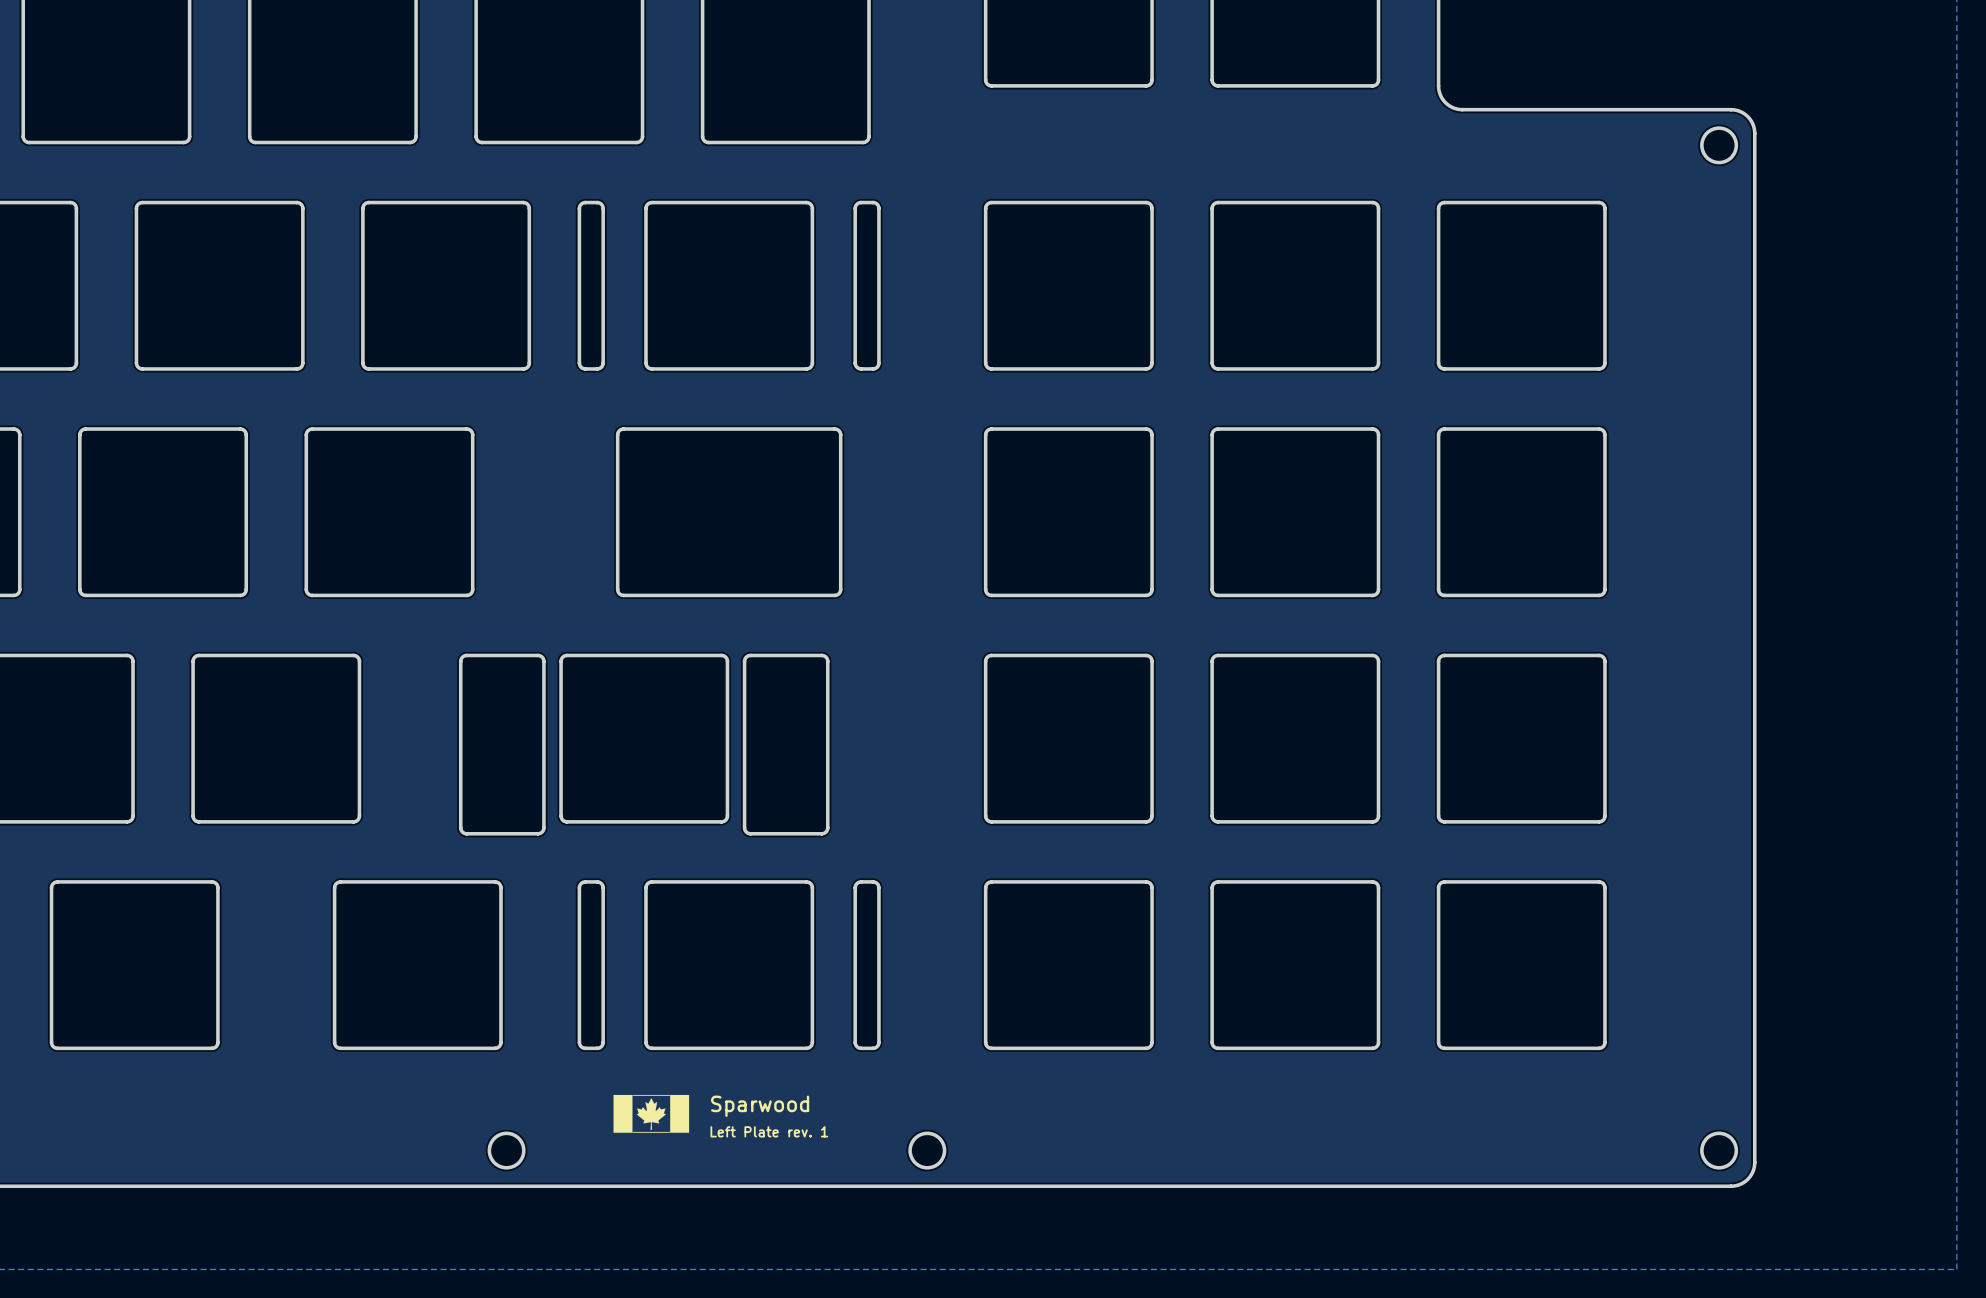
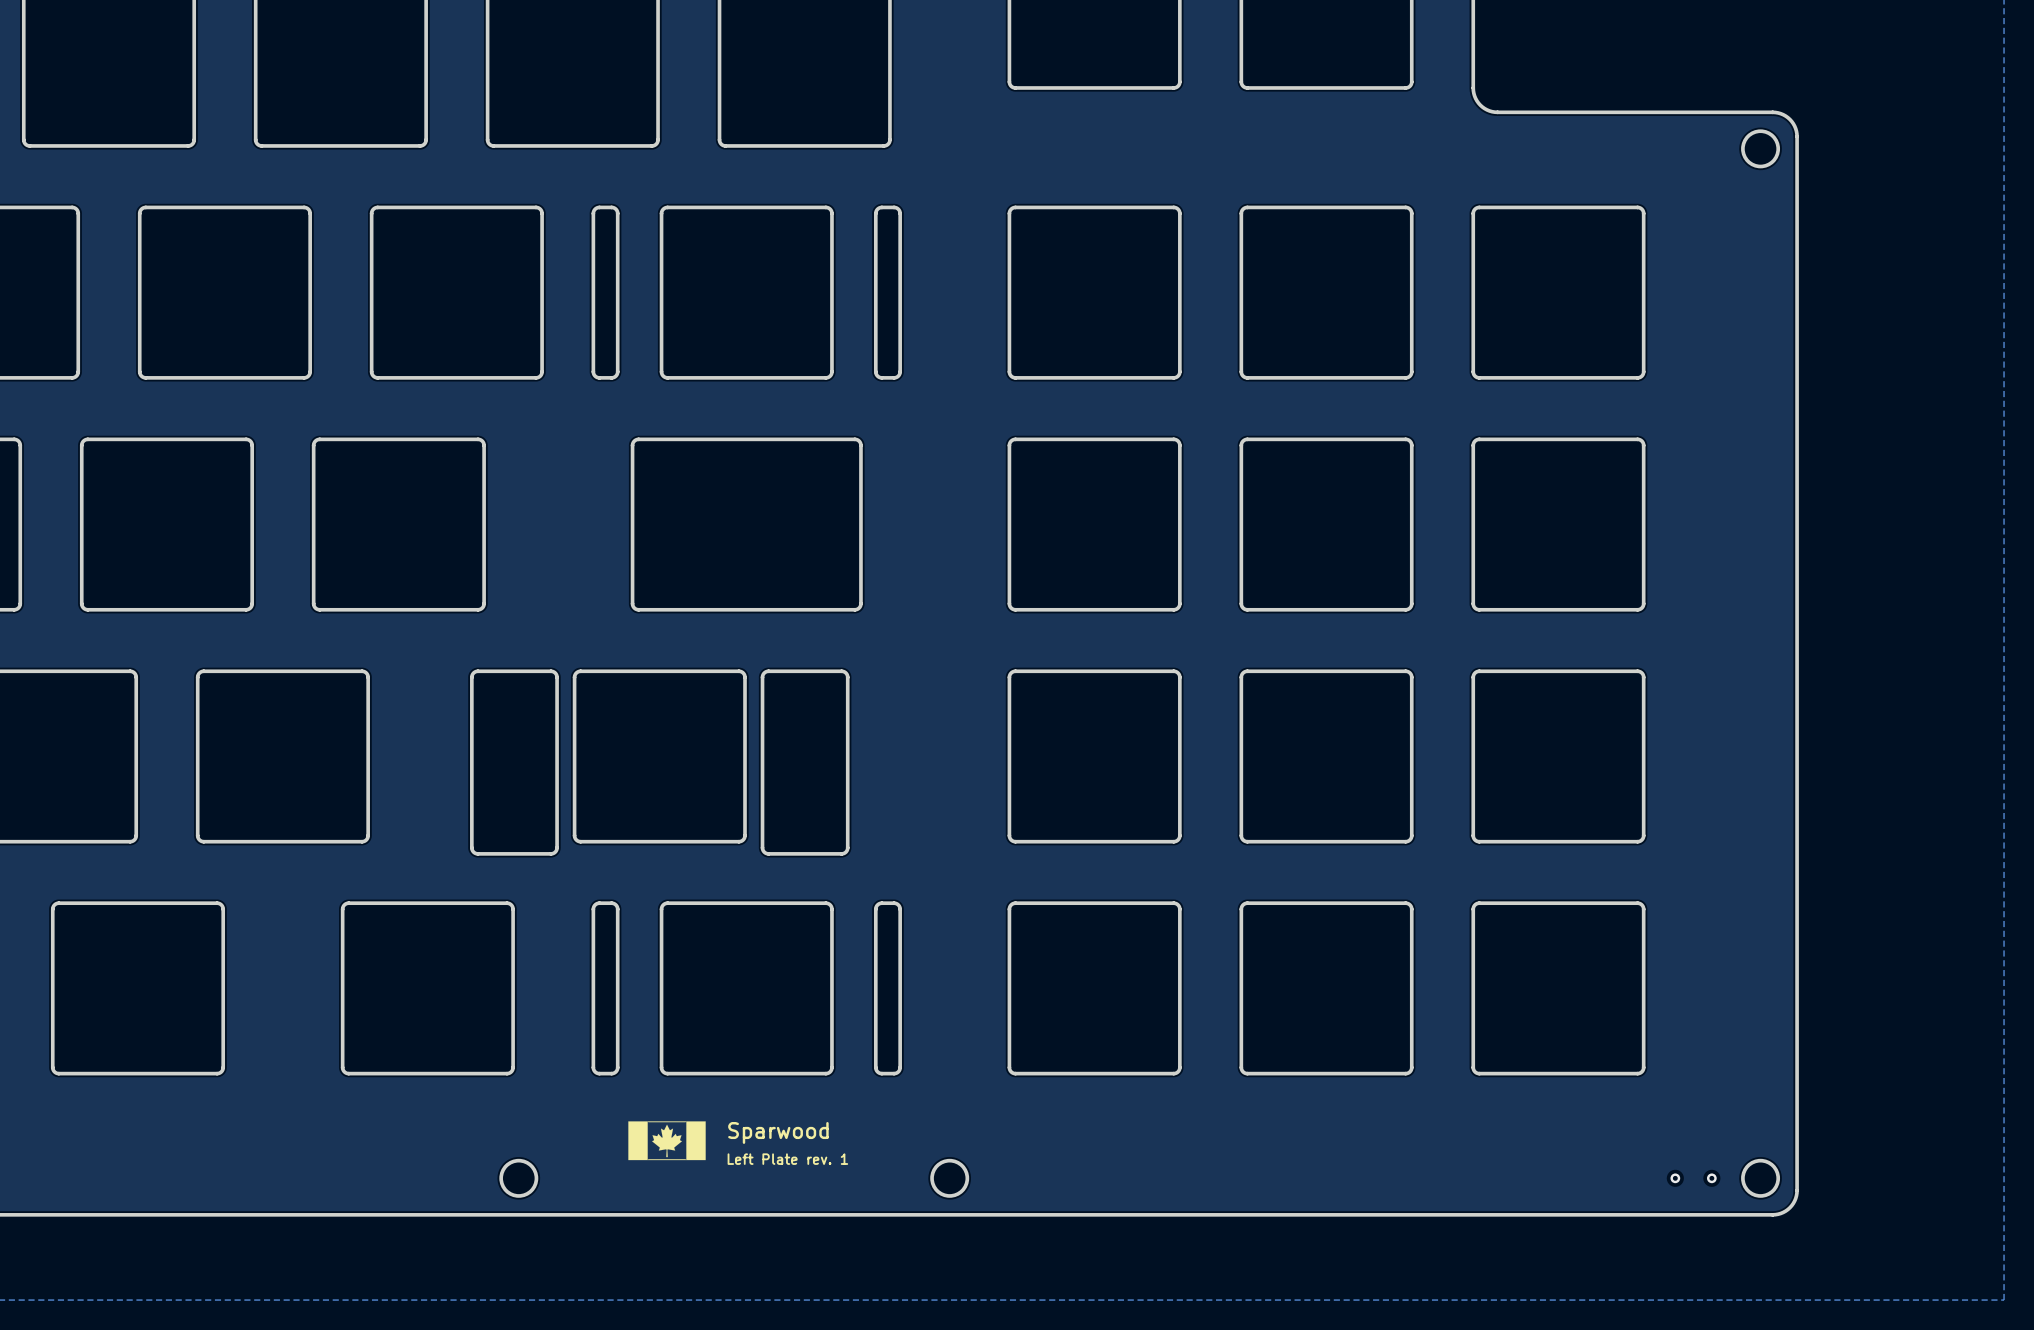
via: none -> (1675, 1178)
via: none -> (1711, 1178)

